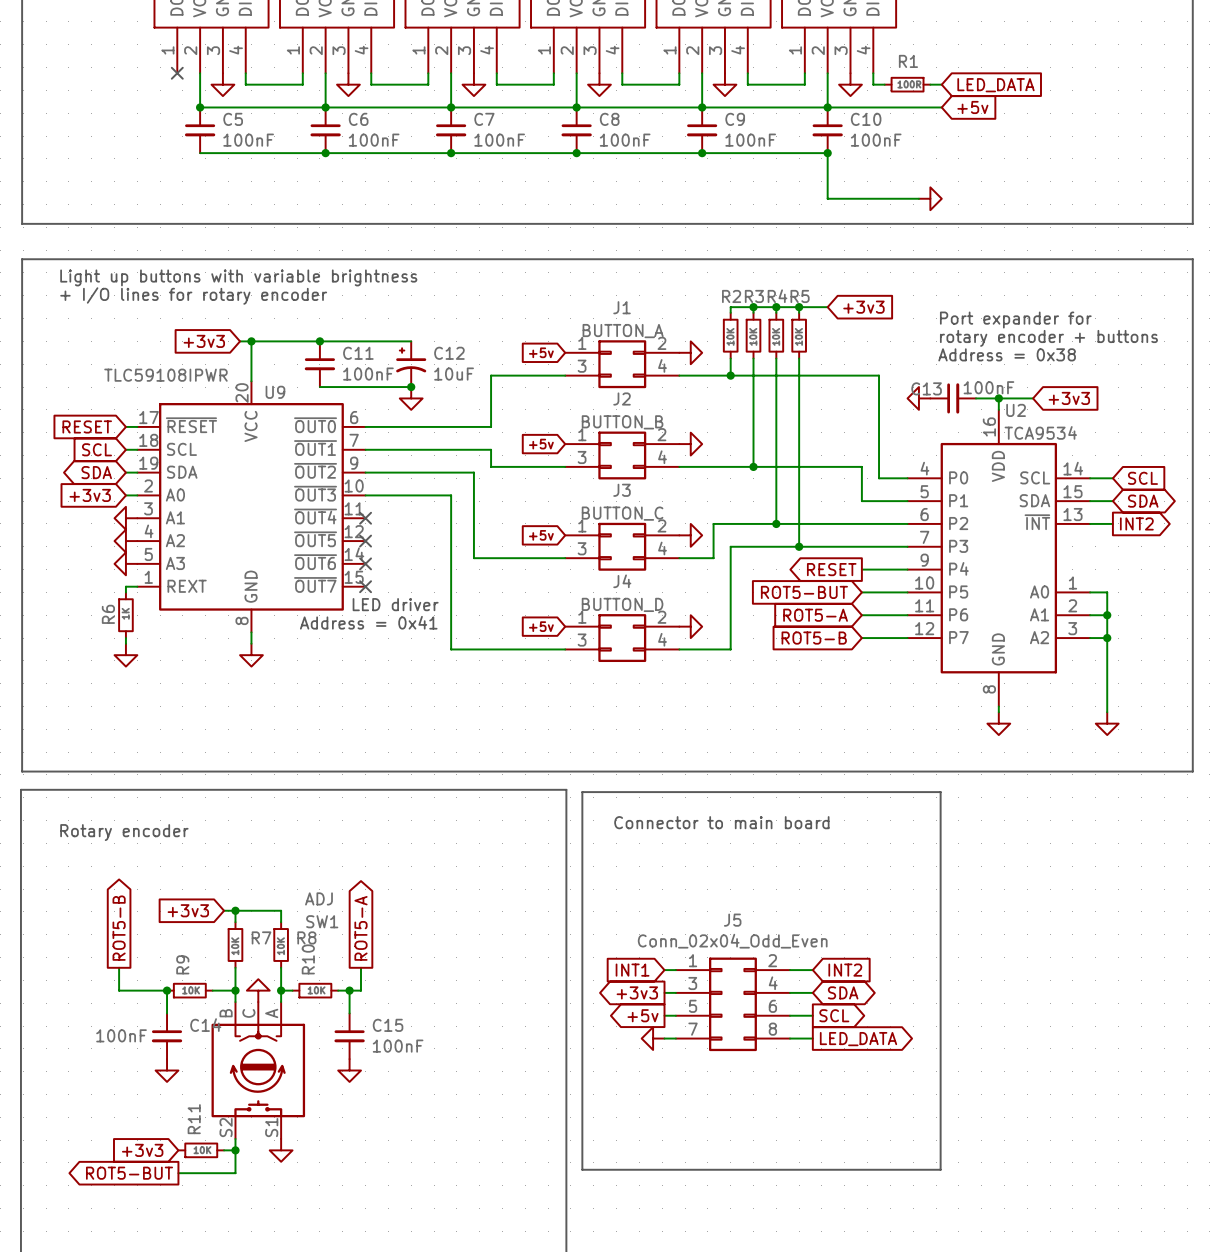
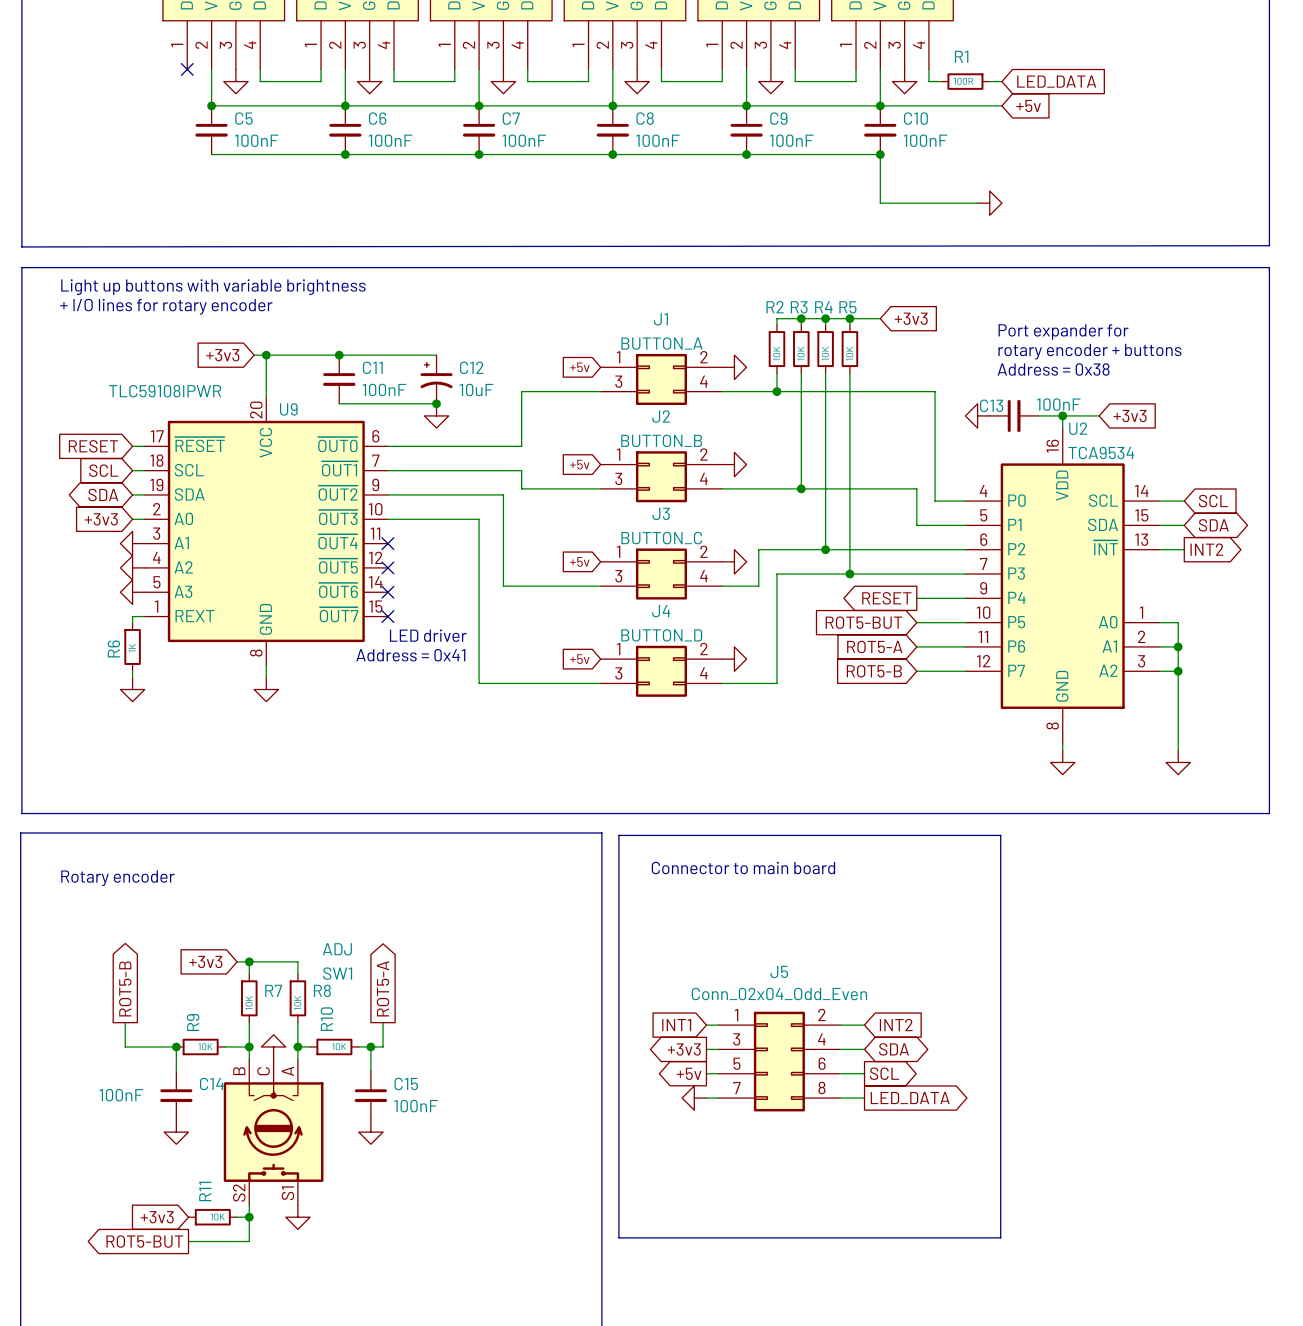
line: (22, 223) (1192, 223) -> (21, 229) (21, 246) (1269, 245) (1269, 229)

